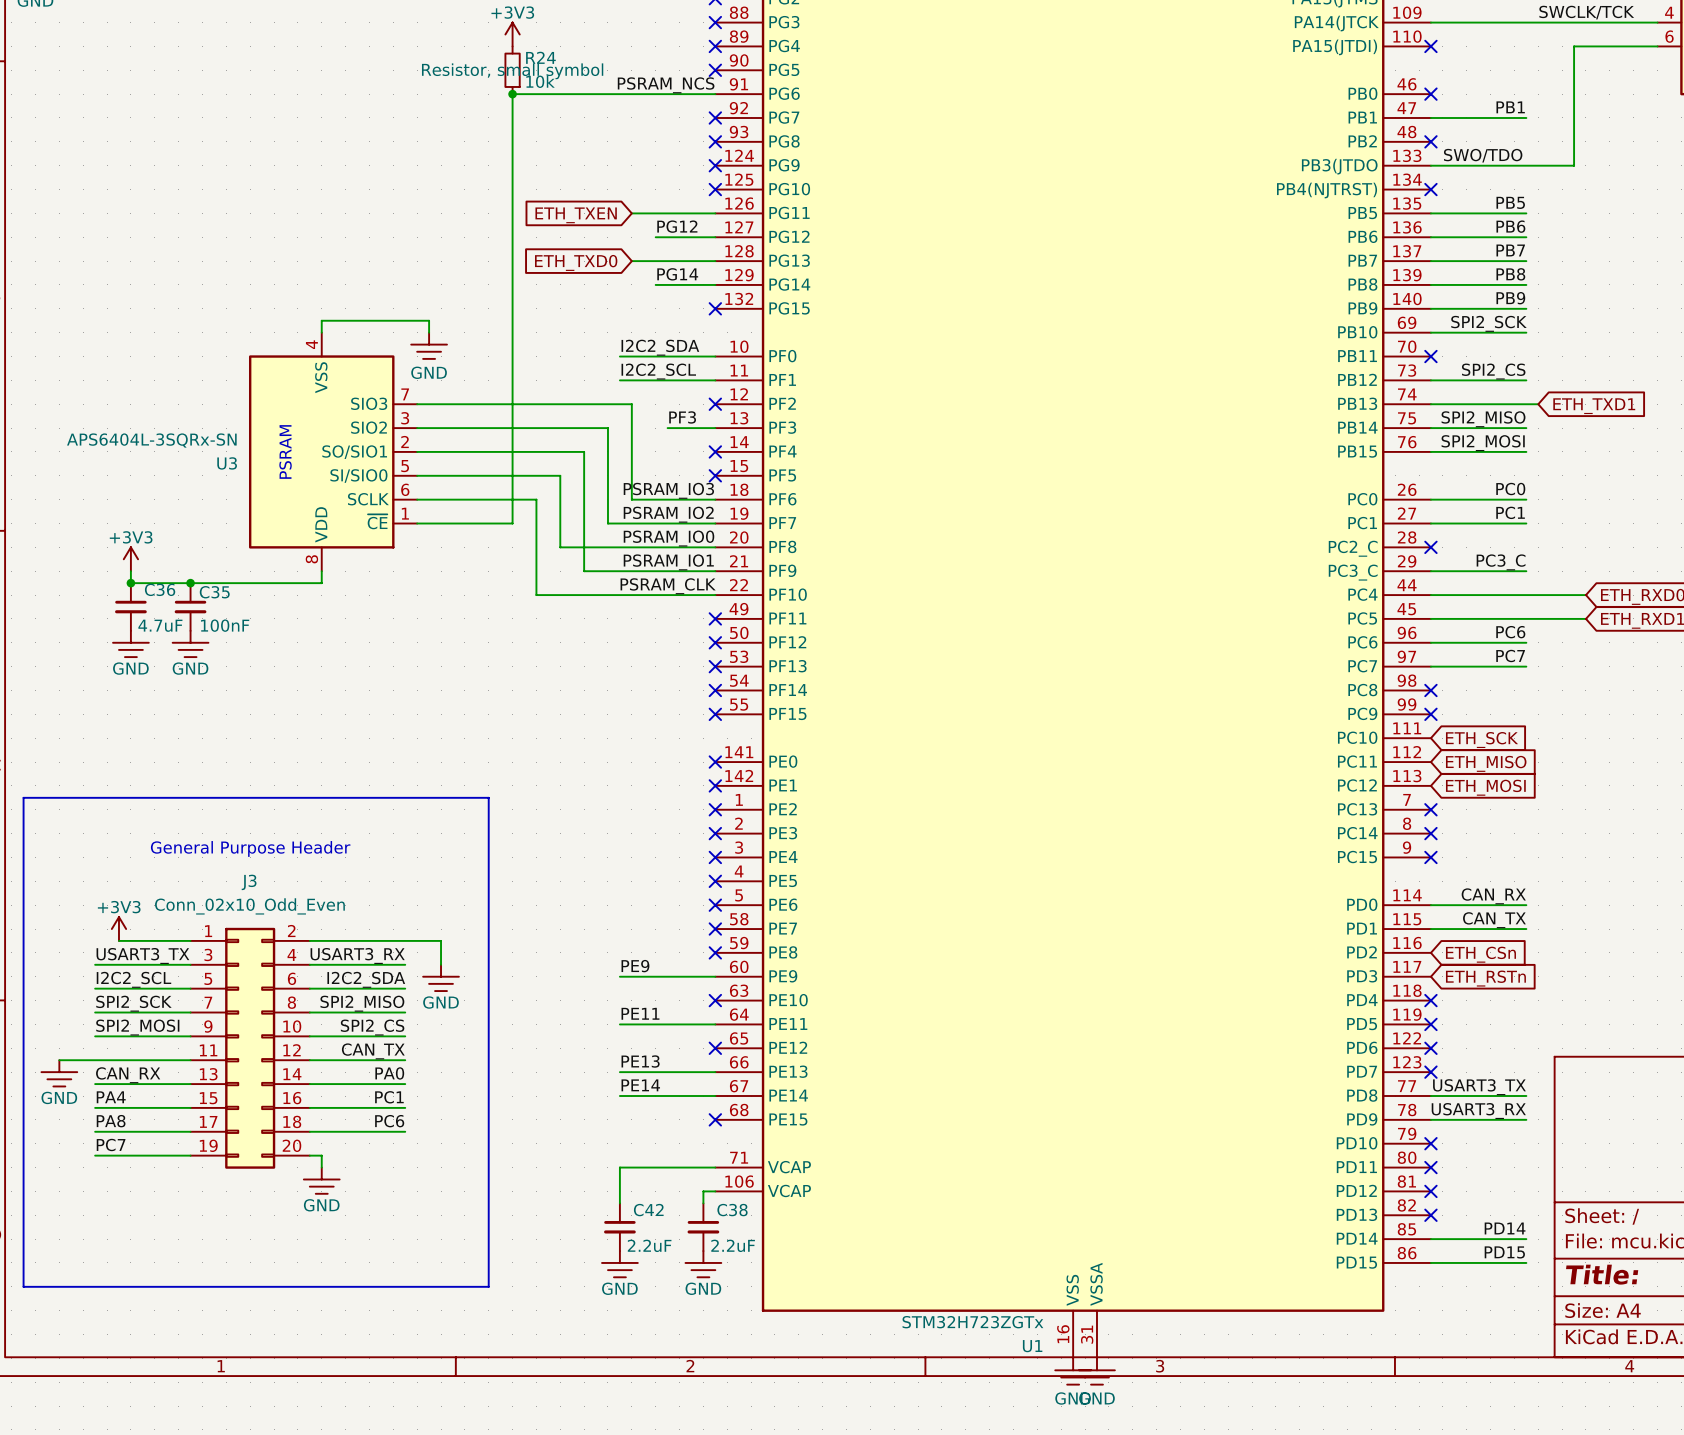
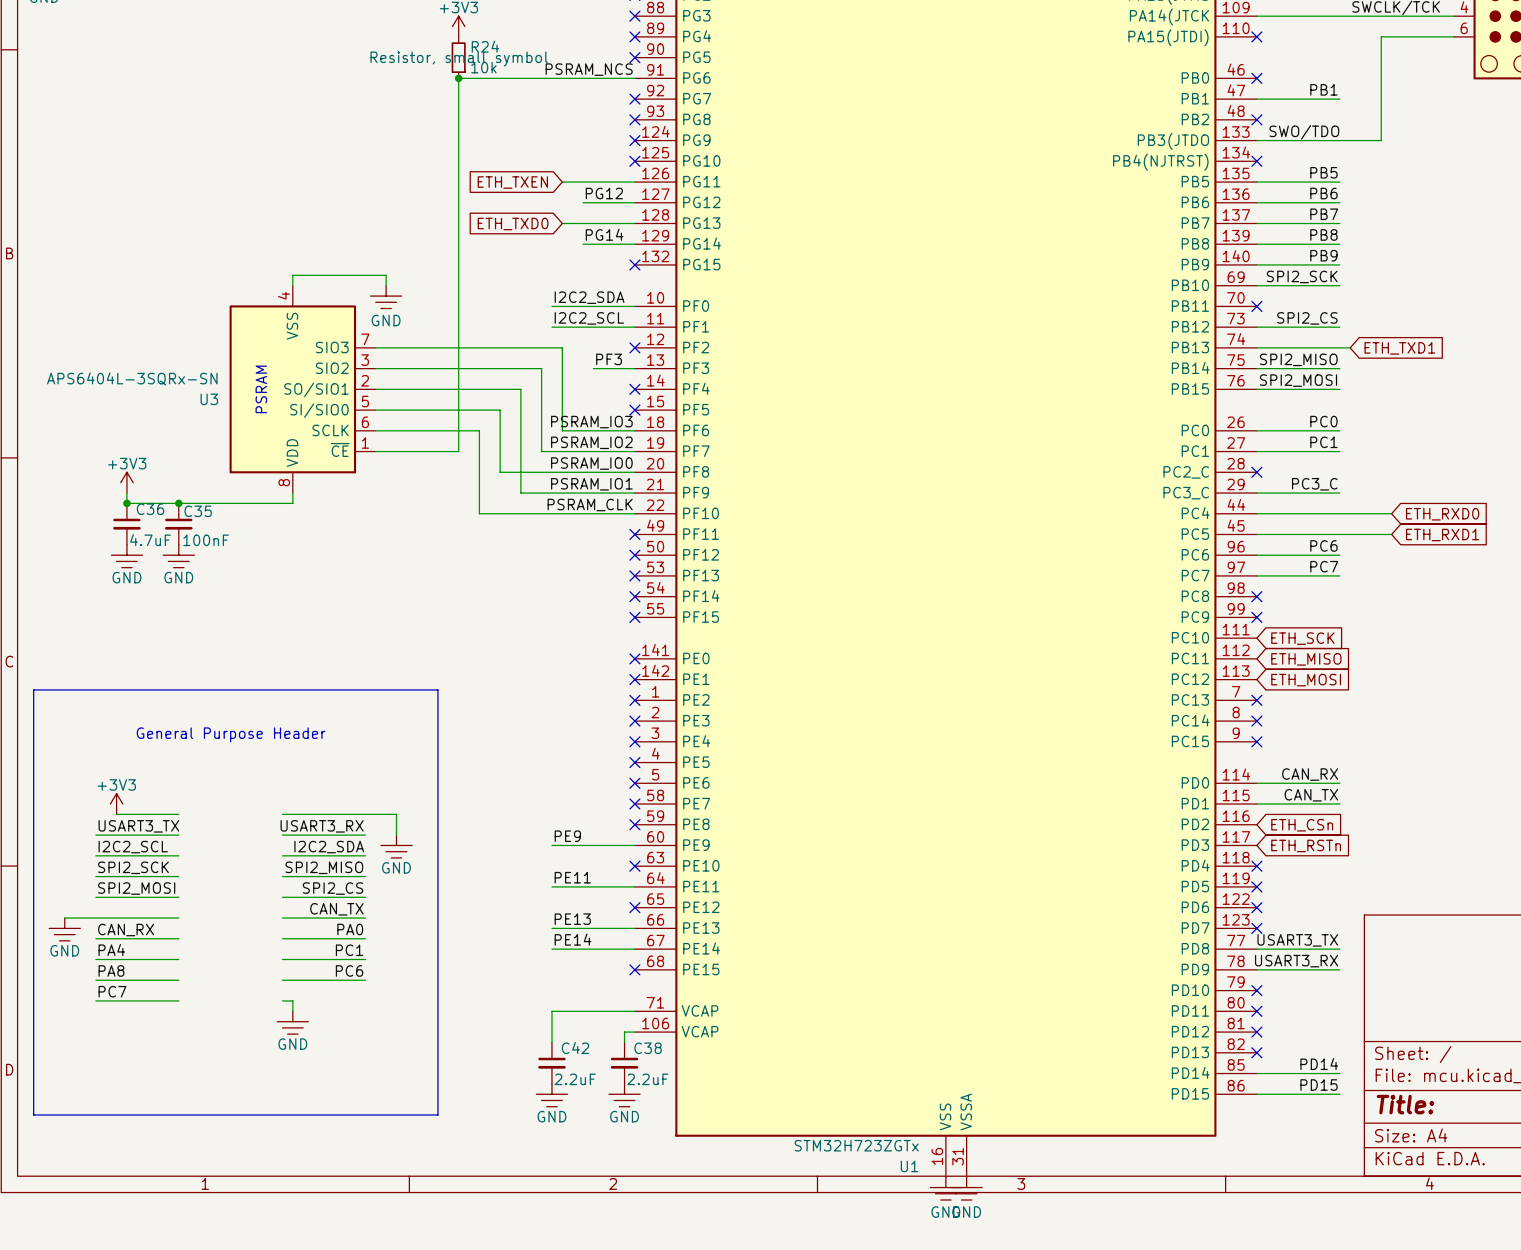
J3: Conn_02x10_Odd_Even (250, 1048) -> none

